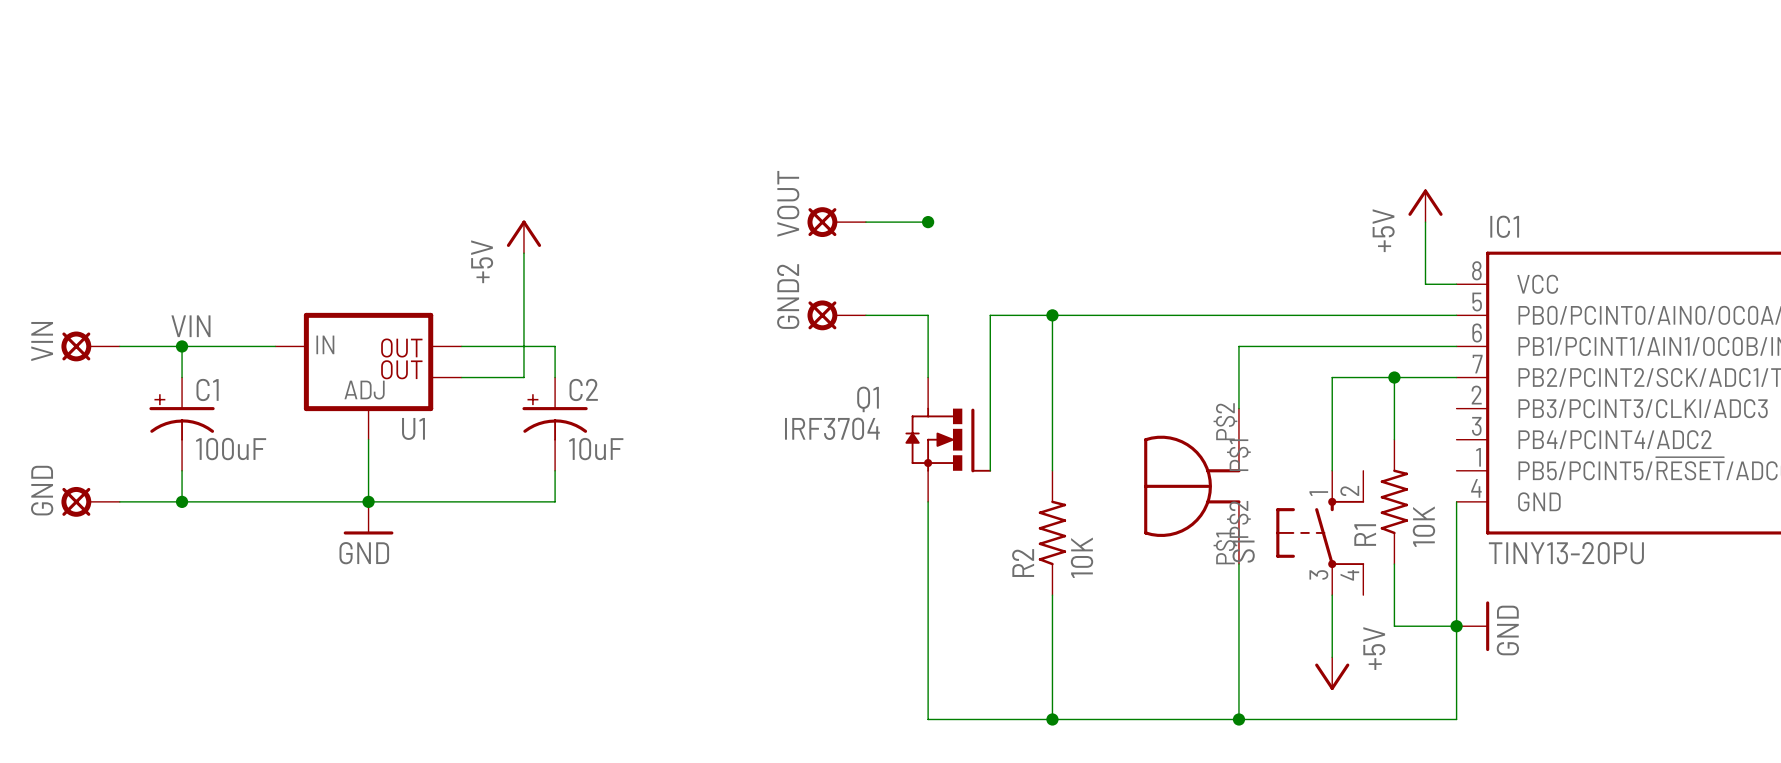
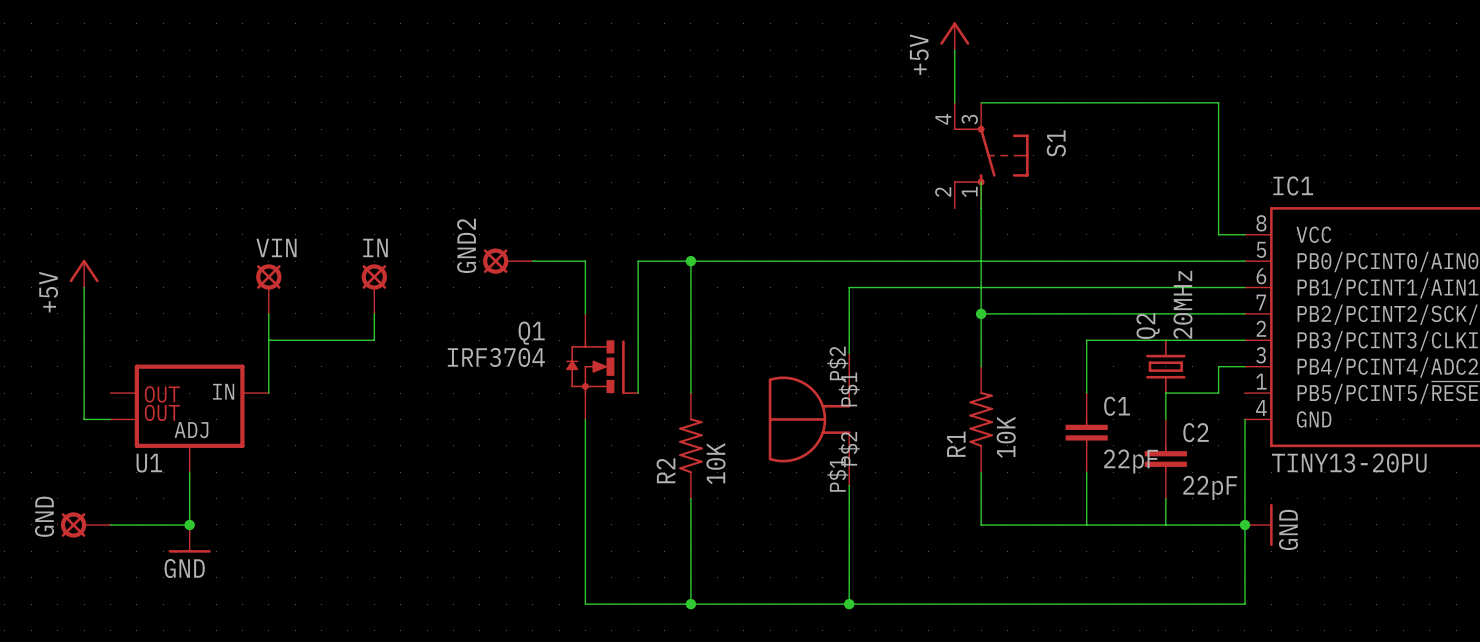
power symbol: none -> +5V (954, 36)
wire: none -> (954, 50) (954, 102)
wire: none -> (981, 102) (1218, 102) (1218, 182)
power symbol: +5V (1425, 205) -> none
VOUT: (836, 222) -> none
wire: (865, 222) (928, 222) -> none
junction: (928, 222) -> none
wire: none -> (981, 182) (981, 366)
power symbol: +5V (523, 236) -> none
wire: (523, 253) (523, 377) (461, 377) -> none
wire: none -> (532, 261) (585, 261) (585, 313)
junction: none -> (690, 261)
GND2 position: (836, 315) -> (507, 261)
wire: none -> (743, 261) (638, 261) (638, 393)
wire: (928, 315) (928, 377) -> none
wire: (990, 315) (990, 346) -> (849, 261) (796, 261)
wire: (1052, 315) (1052, 470) -> (690, 261) (690, 393)
junction: (1052, 315) -> none
label: VIN (190, 326) -> none
power symbol: none -> +5V (84, 273)
VIN rotation: 0° (76, 346) -> 90° clockwise (268, 276)
VIN position: (90, 346) -> (268, 289)
wire: (119, 346) (275, 346) -> none
wire: (182, 346) (182, 377) -> none
junction: (182, 346) -> none
wire: (461, 346) (555, 346) (555, 377) -> none
wire: (1238, 346) (1238, 408) -> (1060, 287) (849, 287)
IN: none -> (374, 289)
U1 flip: as is (368, 361) -> left-right (189, 406)
U1 position: (368, 376) -> (189, 418)
C1 symbol: [149, 377, 215, 471] -> [1065, 393, 1108, 473]
wire: none -> (268, 313) (268, 393)
C2 symbol: [522, 377, 588, 471] -> [1144, 419, 1187, 499]
junction: none -> (981, 313)
wire: (1332, 377) (1332, 470) -> (1139, 313) (981, 313)
wire: (1394, 377) (1394, 439) -> none
junction: (1394, 377) -> none
wire: none -> (1244, 340) (1086, 340) (1086, 393)
wire: (368, 439) (368, 501) -> none
Q1 position: (948, 439) -> (602, 366)
Q2: none -> 20MHz (1165, 366)
wire: none -> (1244, 366) (1218, 366) (1218, 393) (1165, 393) (1165, 419)
C1 value: 100uF (231, 449) -> 22pF (1131, 461)
C2 value: 10uF (596, 449) -> 22pF (1210, 487)
wire: (182, 470) (182, 501) -> none
wire: (555, 470) (555, 501) (119, 501) -> (84, 287) (84, 419) (110, 419)
part position: (1192, 486) -> (809, 419)
GND position: (90, 501) -> (85, 524)
junction: (182, 501) -> none
junction: (368, 501) -> none
wire: (928, 501) (928, 719) -> (585, 419) (585, 604) (796, 604)
R1 position: (1394, 501) -> (981, 419)
power symbol position: GND (368, 518) -> GND (189, 538)
R2 position: (1052, 532) -> (690, 445)
S1 rotation: 0° (1320, 532) -> 180° (991, 155)
S1 position: (1320, 532) -> (991, 155)
wire: none -> (189, 472) (189, 524) (110, 524)
wire: (1238, 564) (1238, 719) -> none
wire: (1394, 564) (1394, 626) -> (981, 472) (981, 524) (1192, 524)
wire: none -> (849, 485) (849, 604)
wire: (1052, 595) (1052, 719) -> (690, 498) (690, 604)
wire: (1332, 595) (1332, 657) -> (1086, 472) (1086, 524)
wire: none -> (1165, 498) (1165, 524)
junction: none -> (189, 524)
power symbol: +5V (1332, 673) -> none
junction: none -> (690, 604)
junction position: (1052, 719) -> (849, 604)
junction: (1238, 719) -> none

